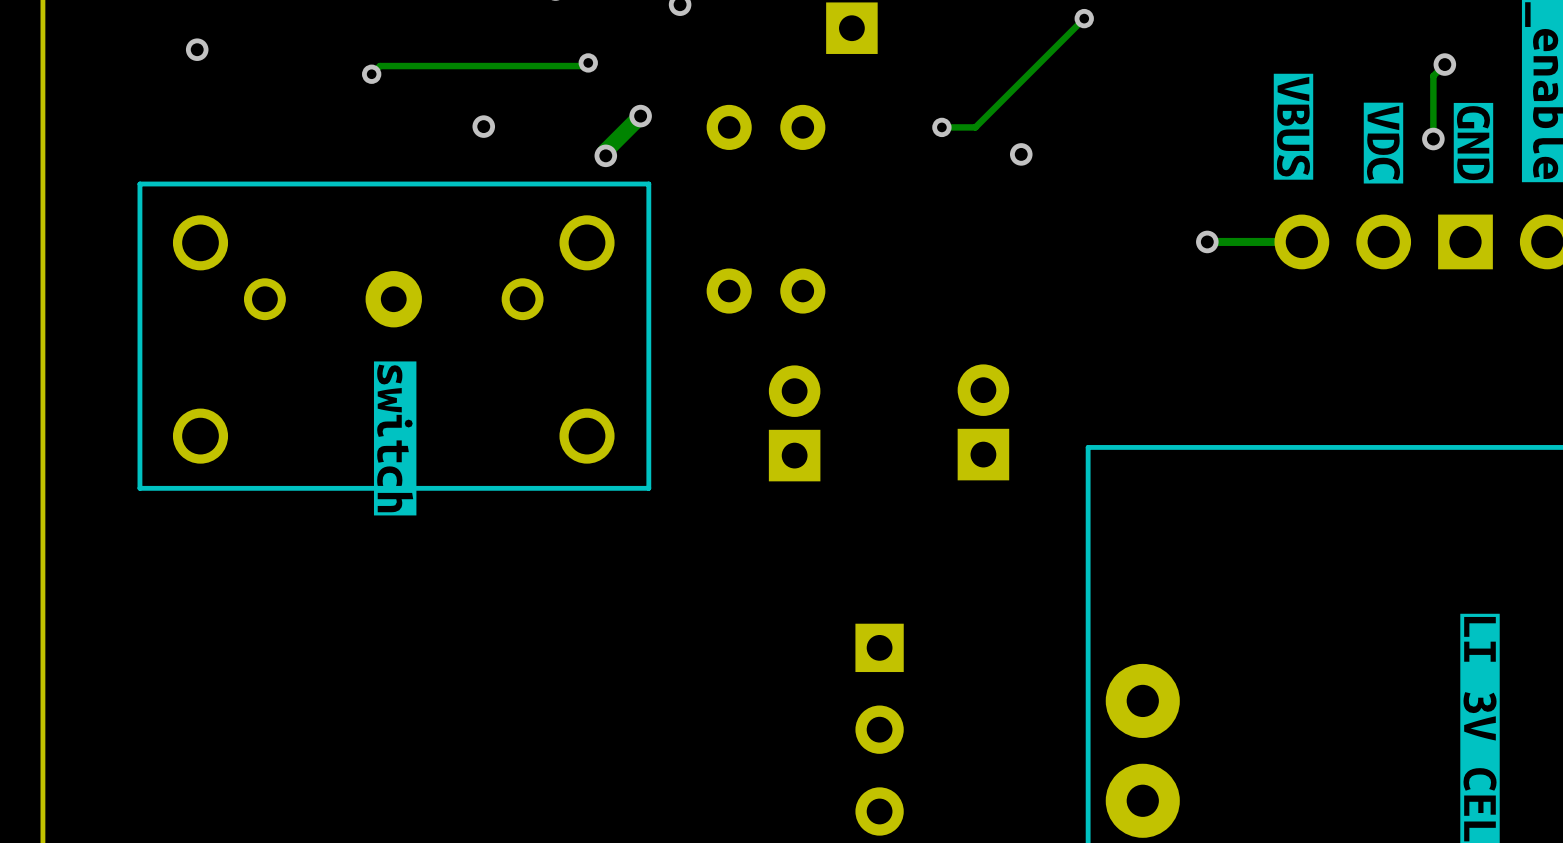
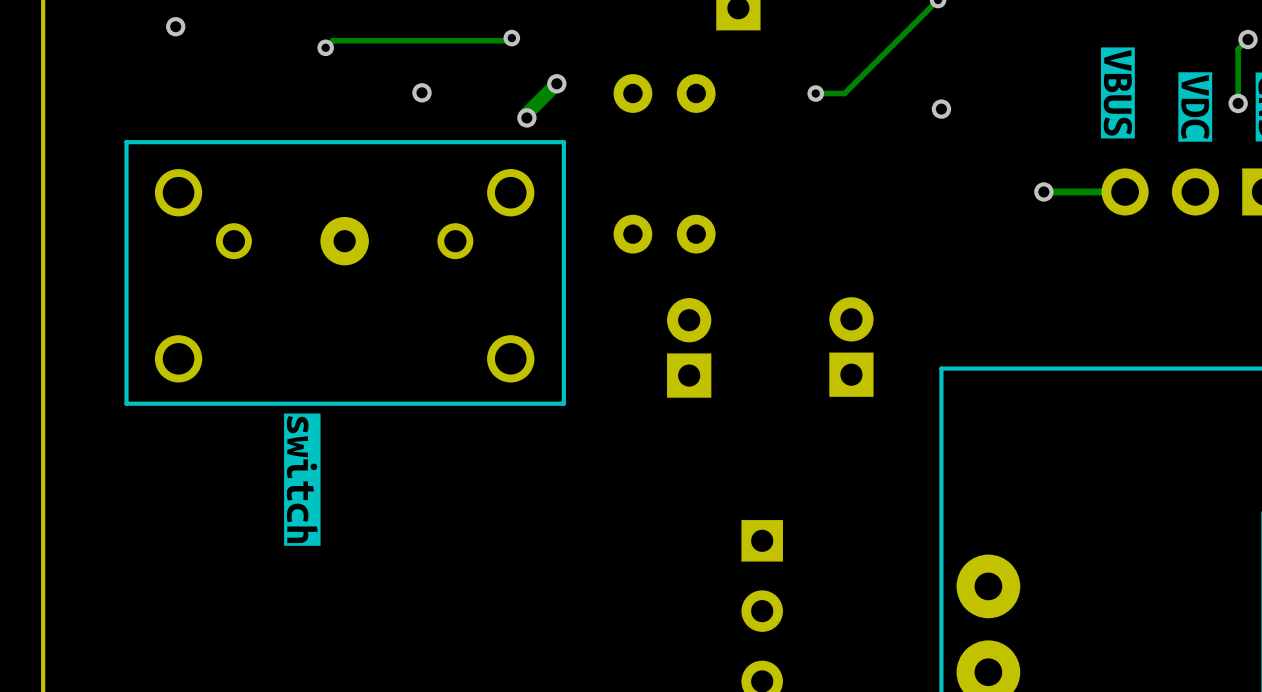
via position: (1021, 154) -> (941, 109)
drawing position: (395, 438) -> (302, 479)

